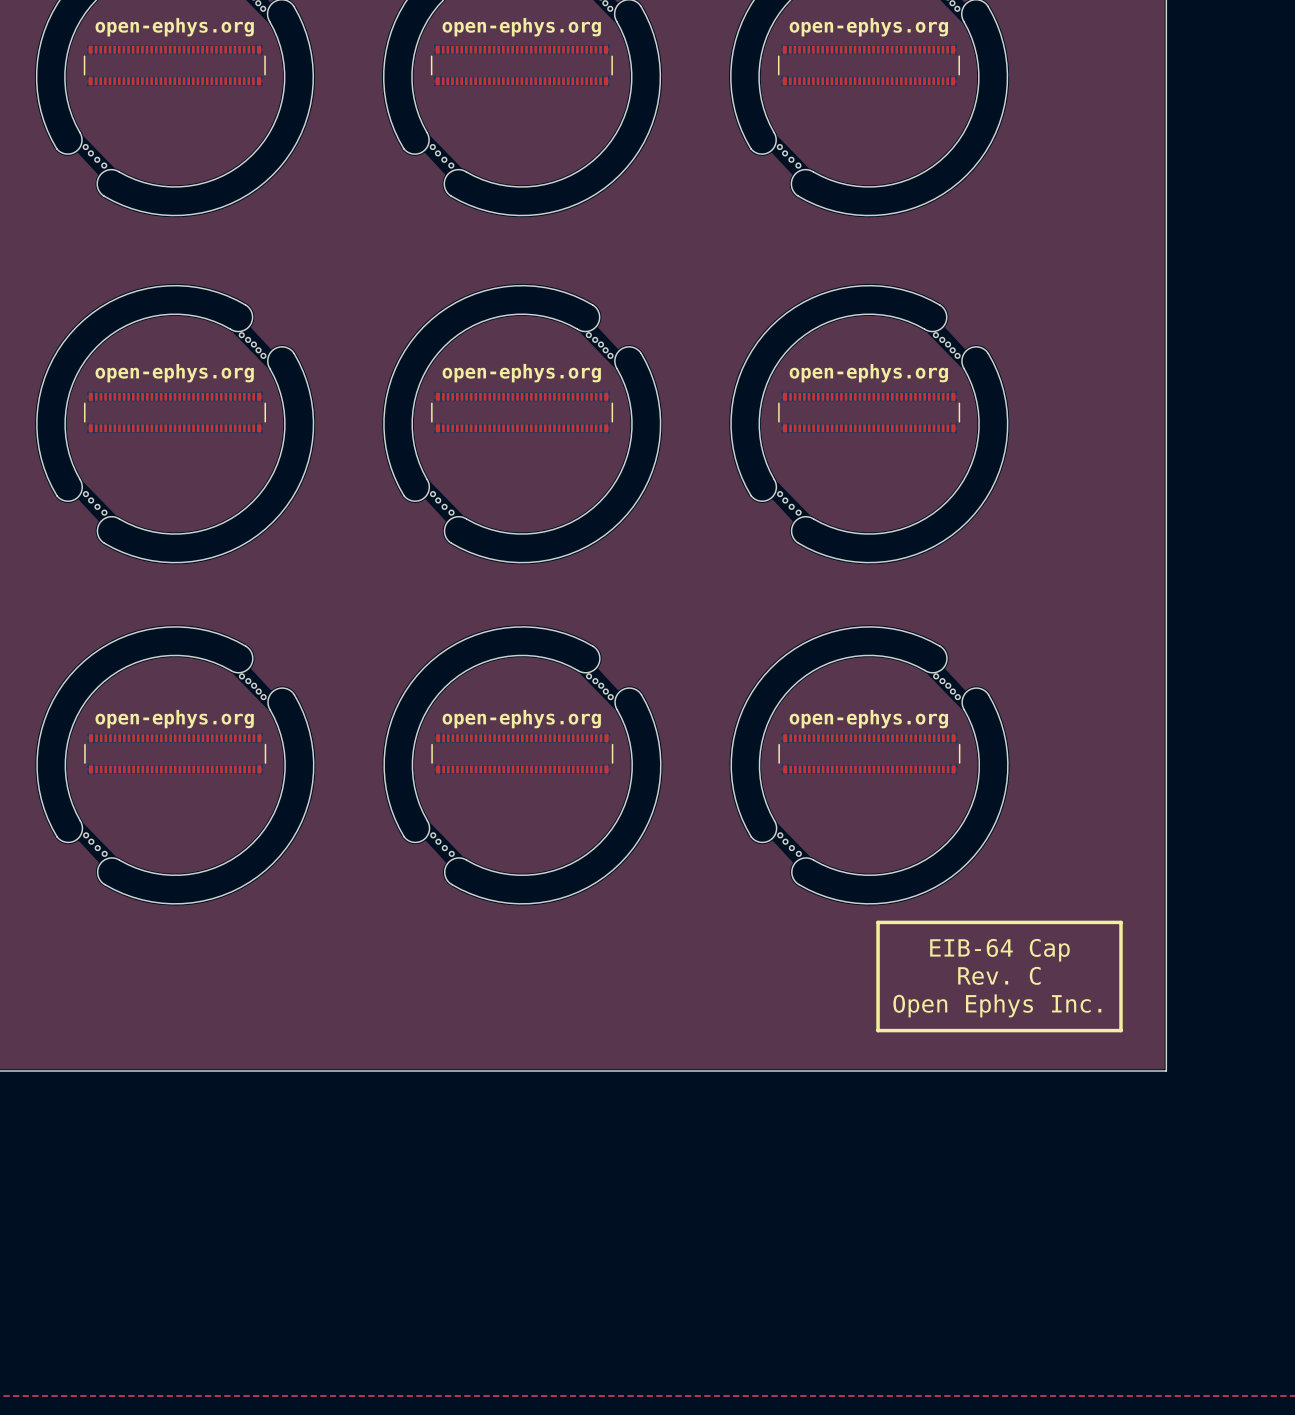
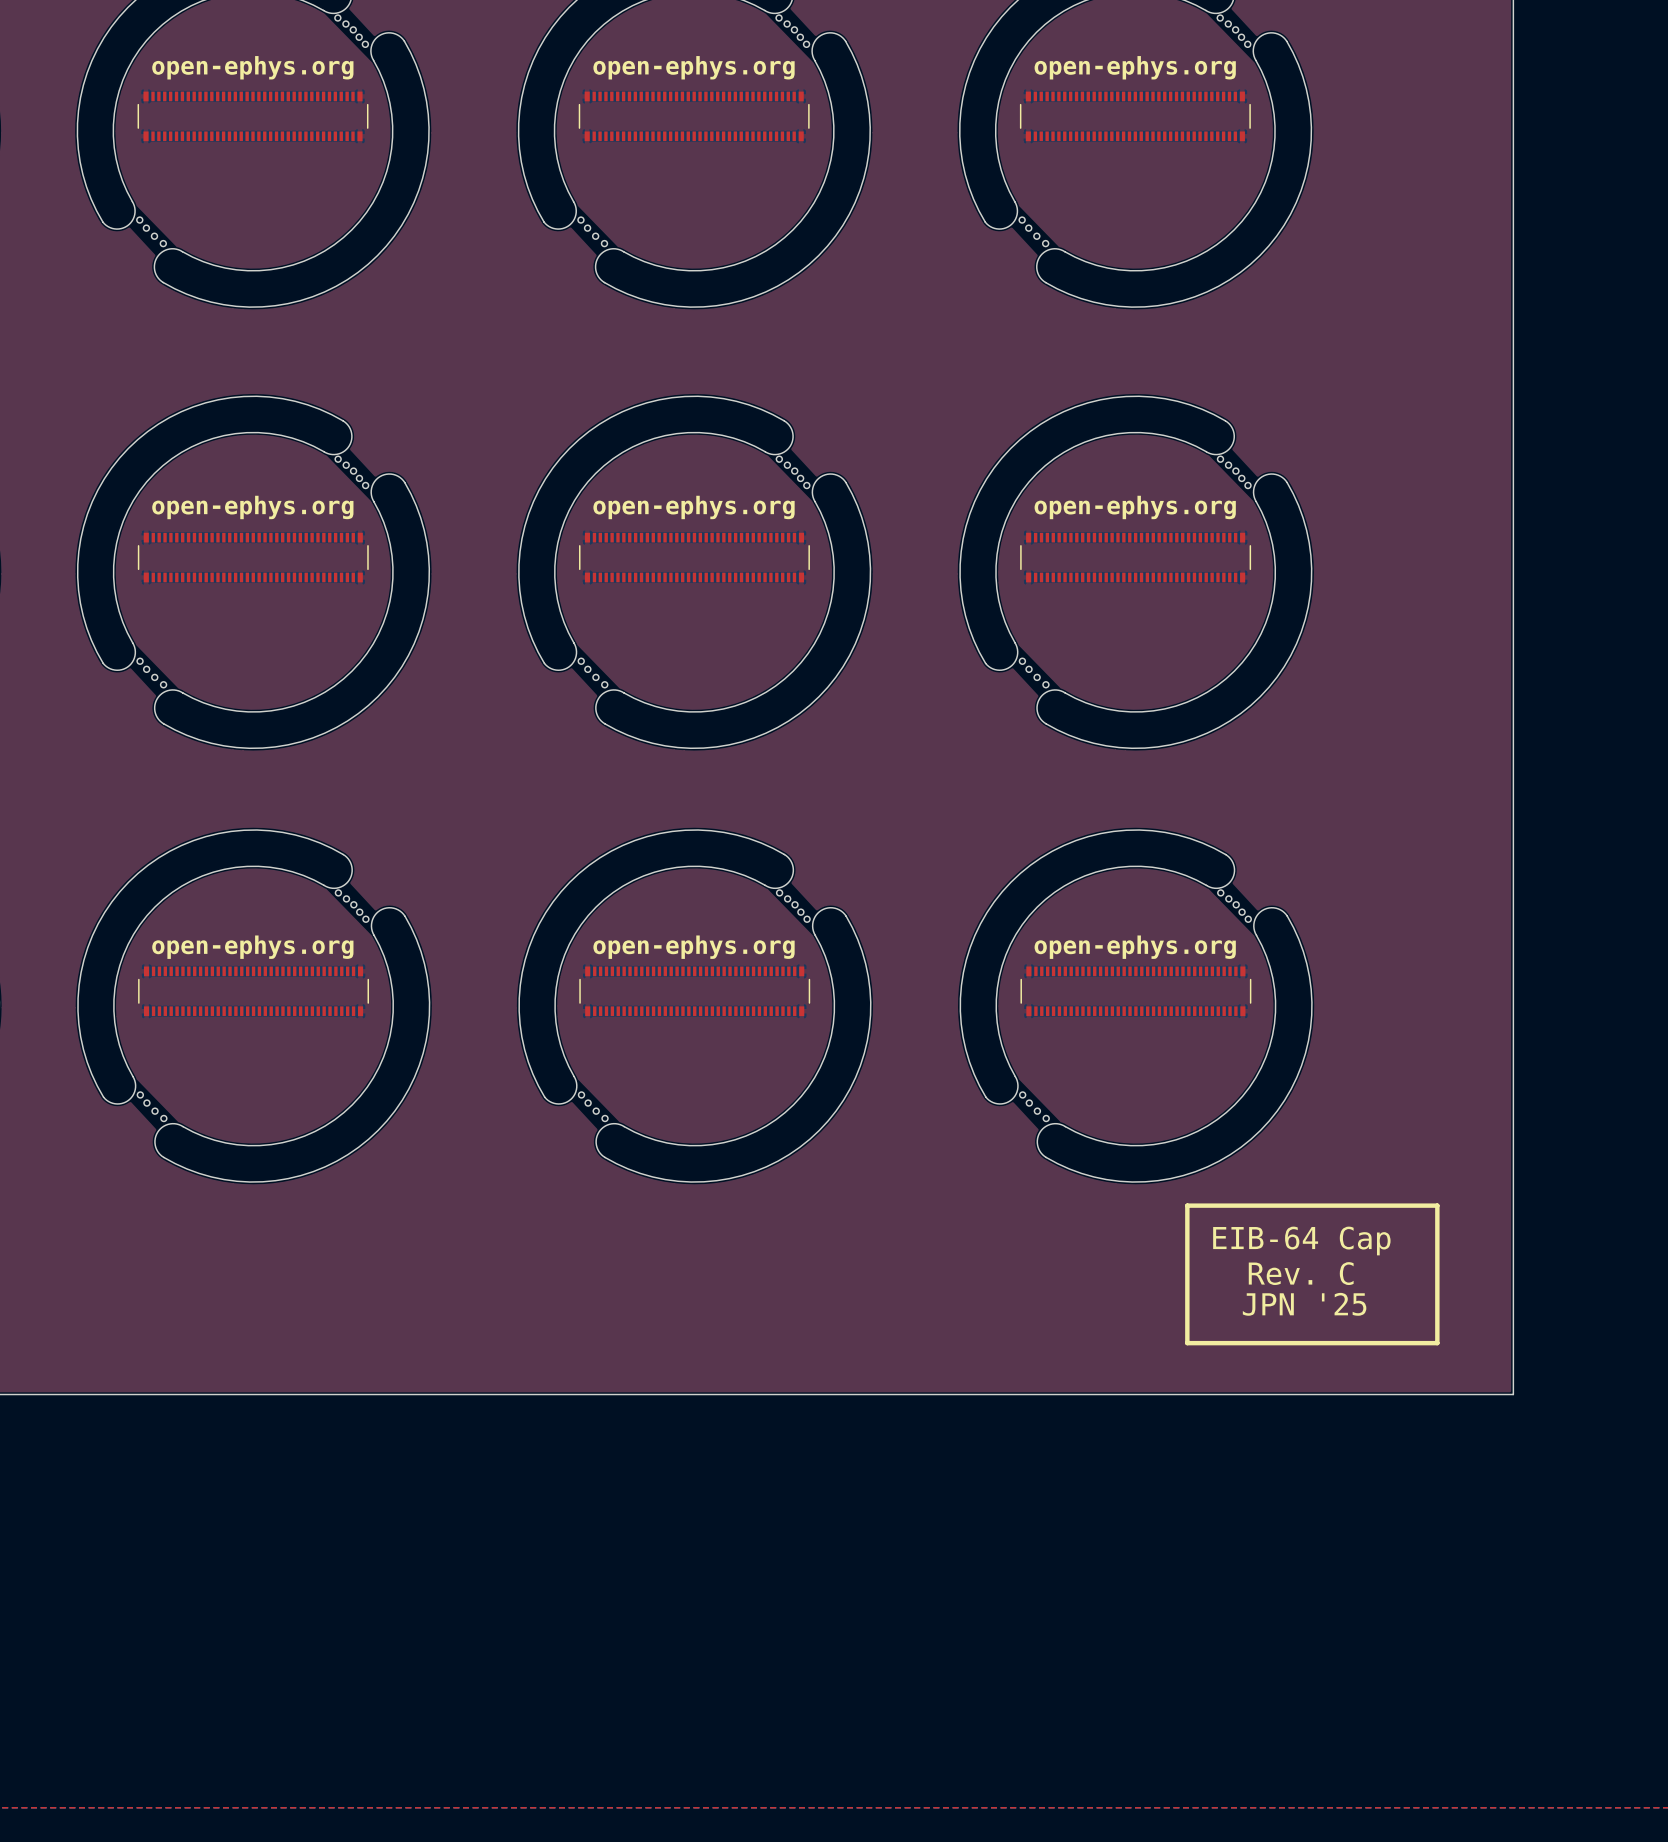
line: (909, 922) (878, 922) (878, 1030) (909, 1030) -> (1187, 1205) (1187, 1343)
line: (1106, 922) (1121, 922) (1121, 1030) (1106, 1030) -> (1437, 1205) (1437, 1343)
text: Open Ephys Inc. (997, 1005) -> JPN '25 (1304, 1304)

